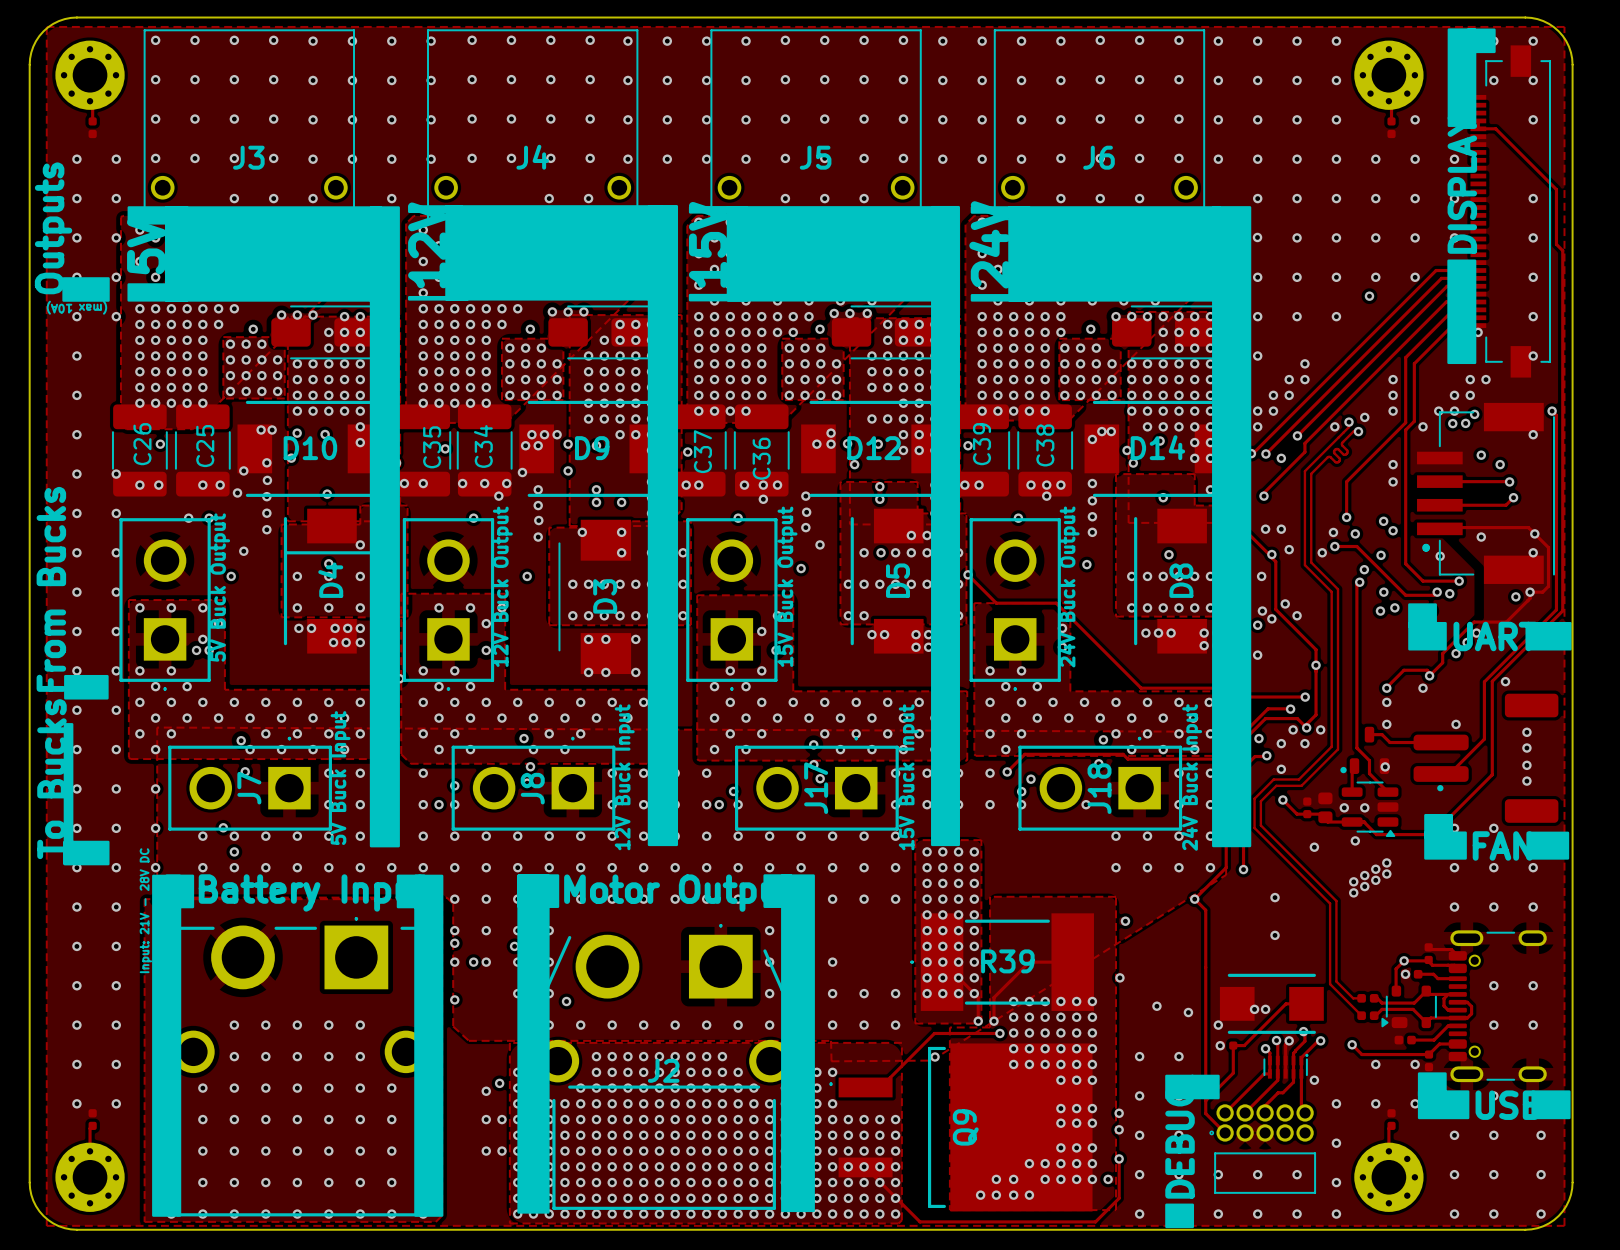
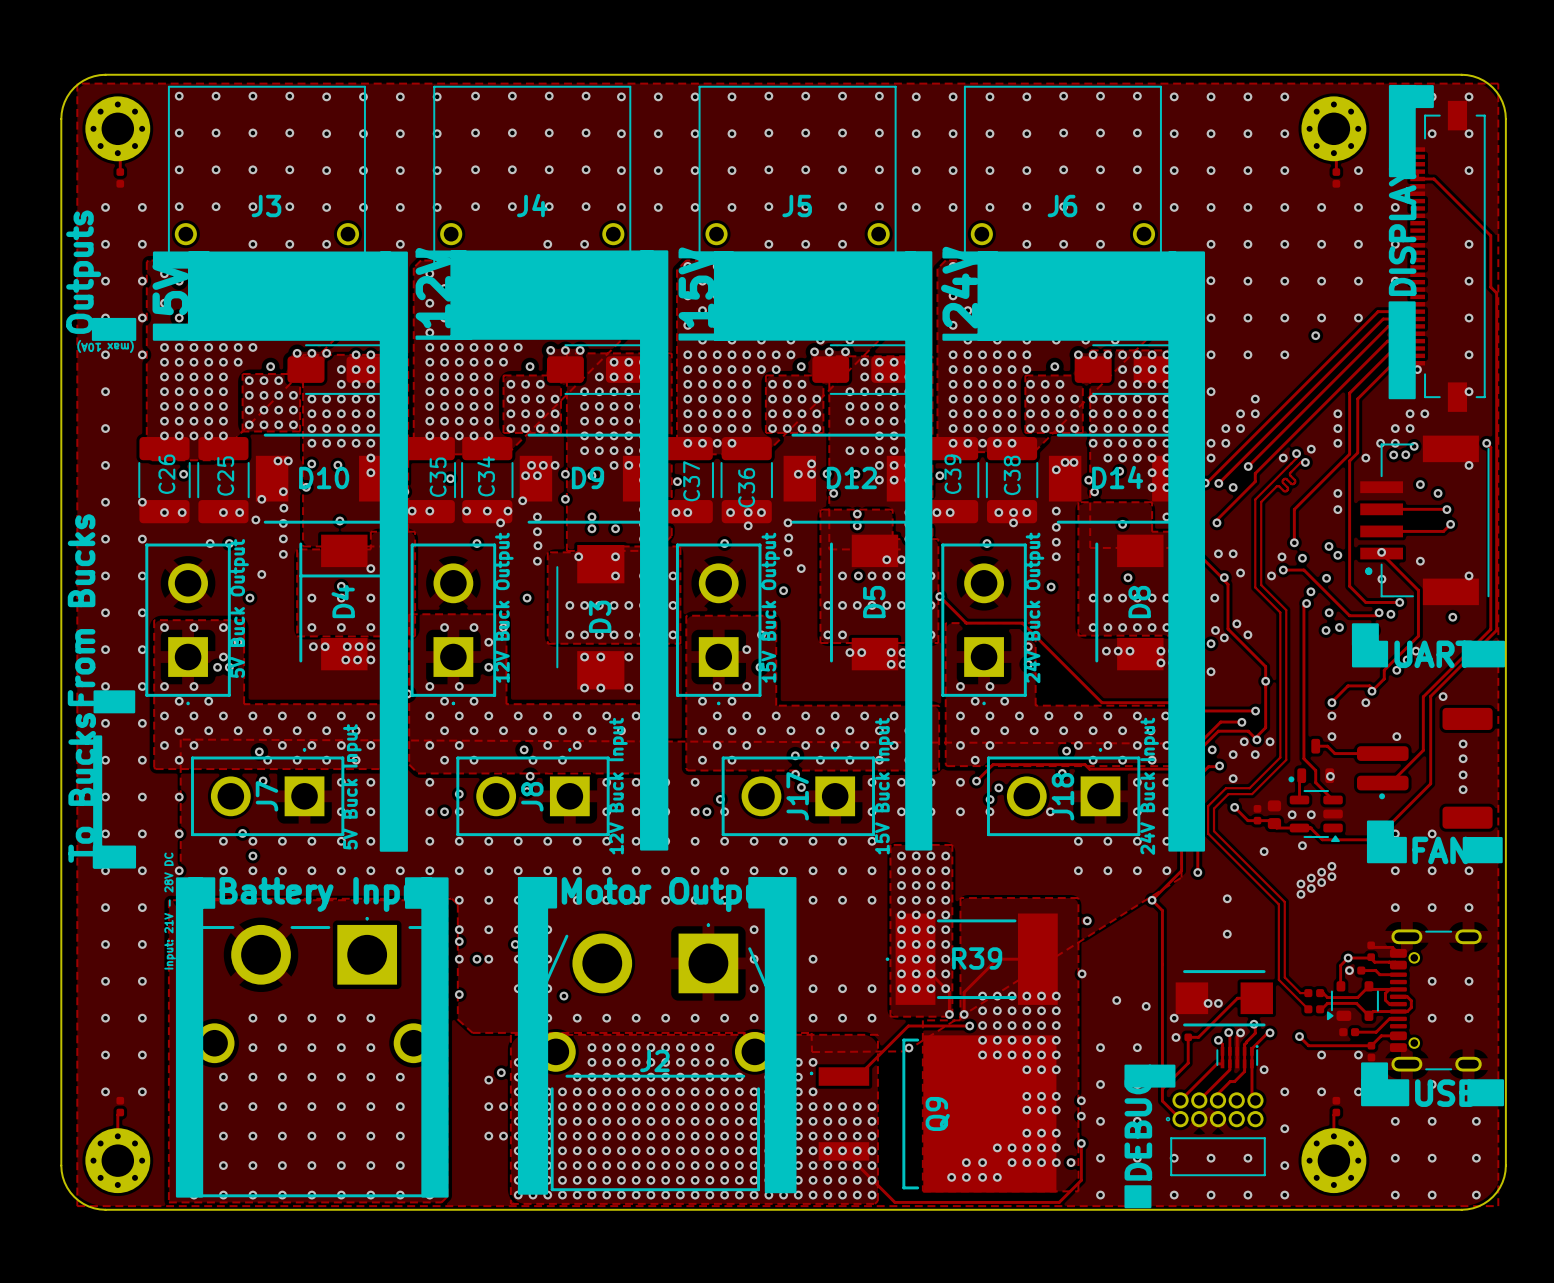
via: none -> (1381, 552)
track: (1439, 528) (1528, 527) (1548, 547) (1548, 586) (1542, 592) (1530, 592) -> (1381, 553) (1418, 590) (1418, 636) (1413, 640)
via: (1534, 533) -> none
via: (1530, 592) -> none
track: (1530, 593) (1530, 598) (1506, 622) (1474, 622) -> none

